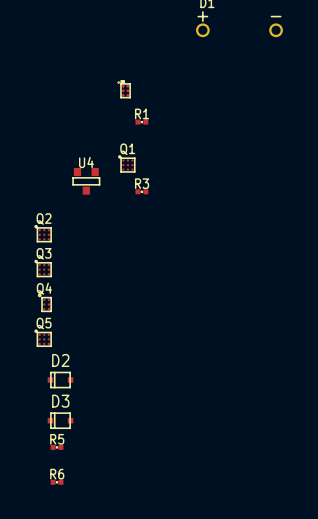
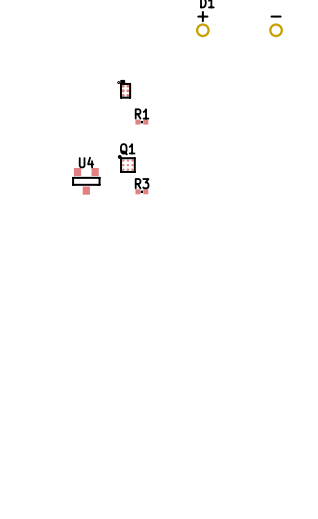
Q2: (43, 233) -> none
Q3: (43, 268) -> none
Q4: (44, 302) -> none
Q5: (43, 338) -> none
D2: (60, 380) -> none
D3: (60, 420) -> none
R5: (57, 447) -> none
R6: (57, 482) -> none

